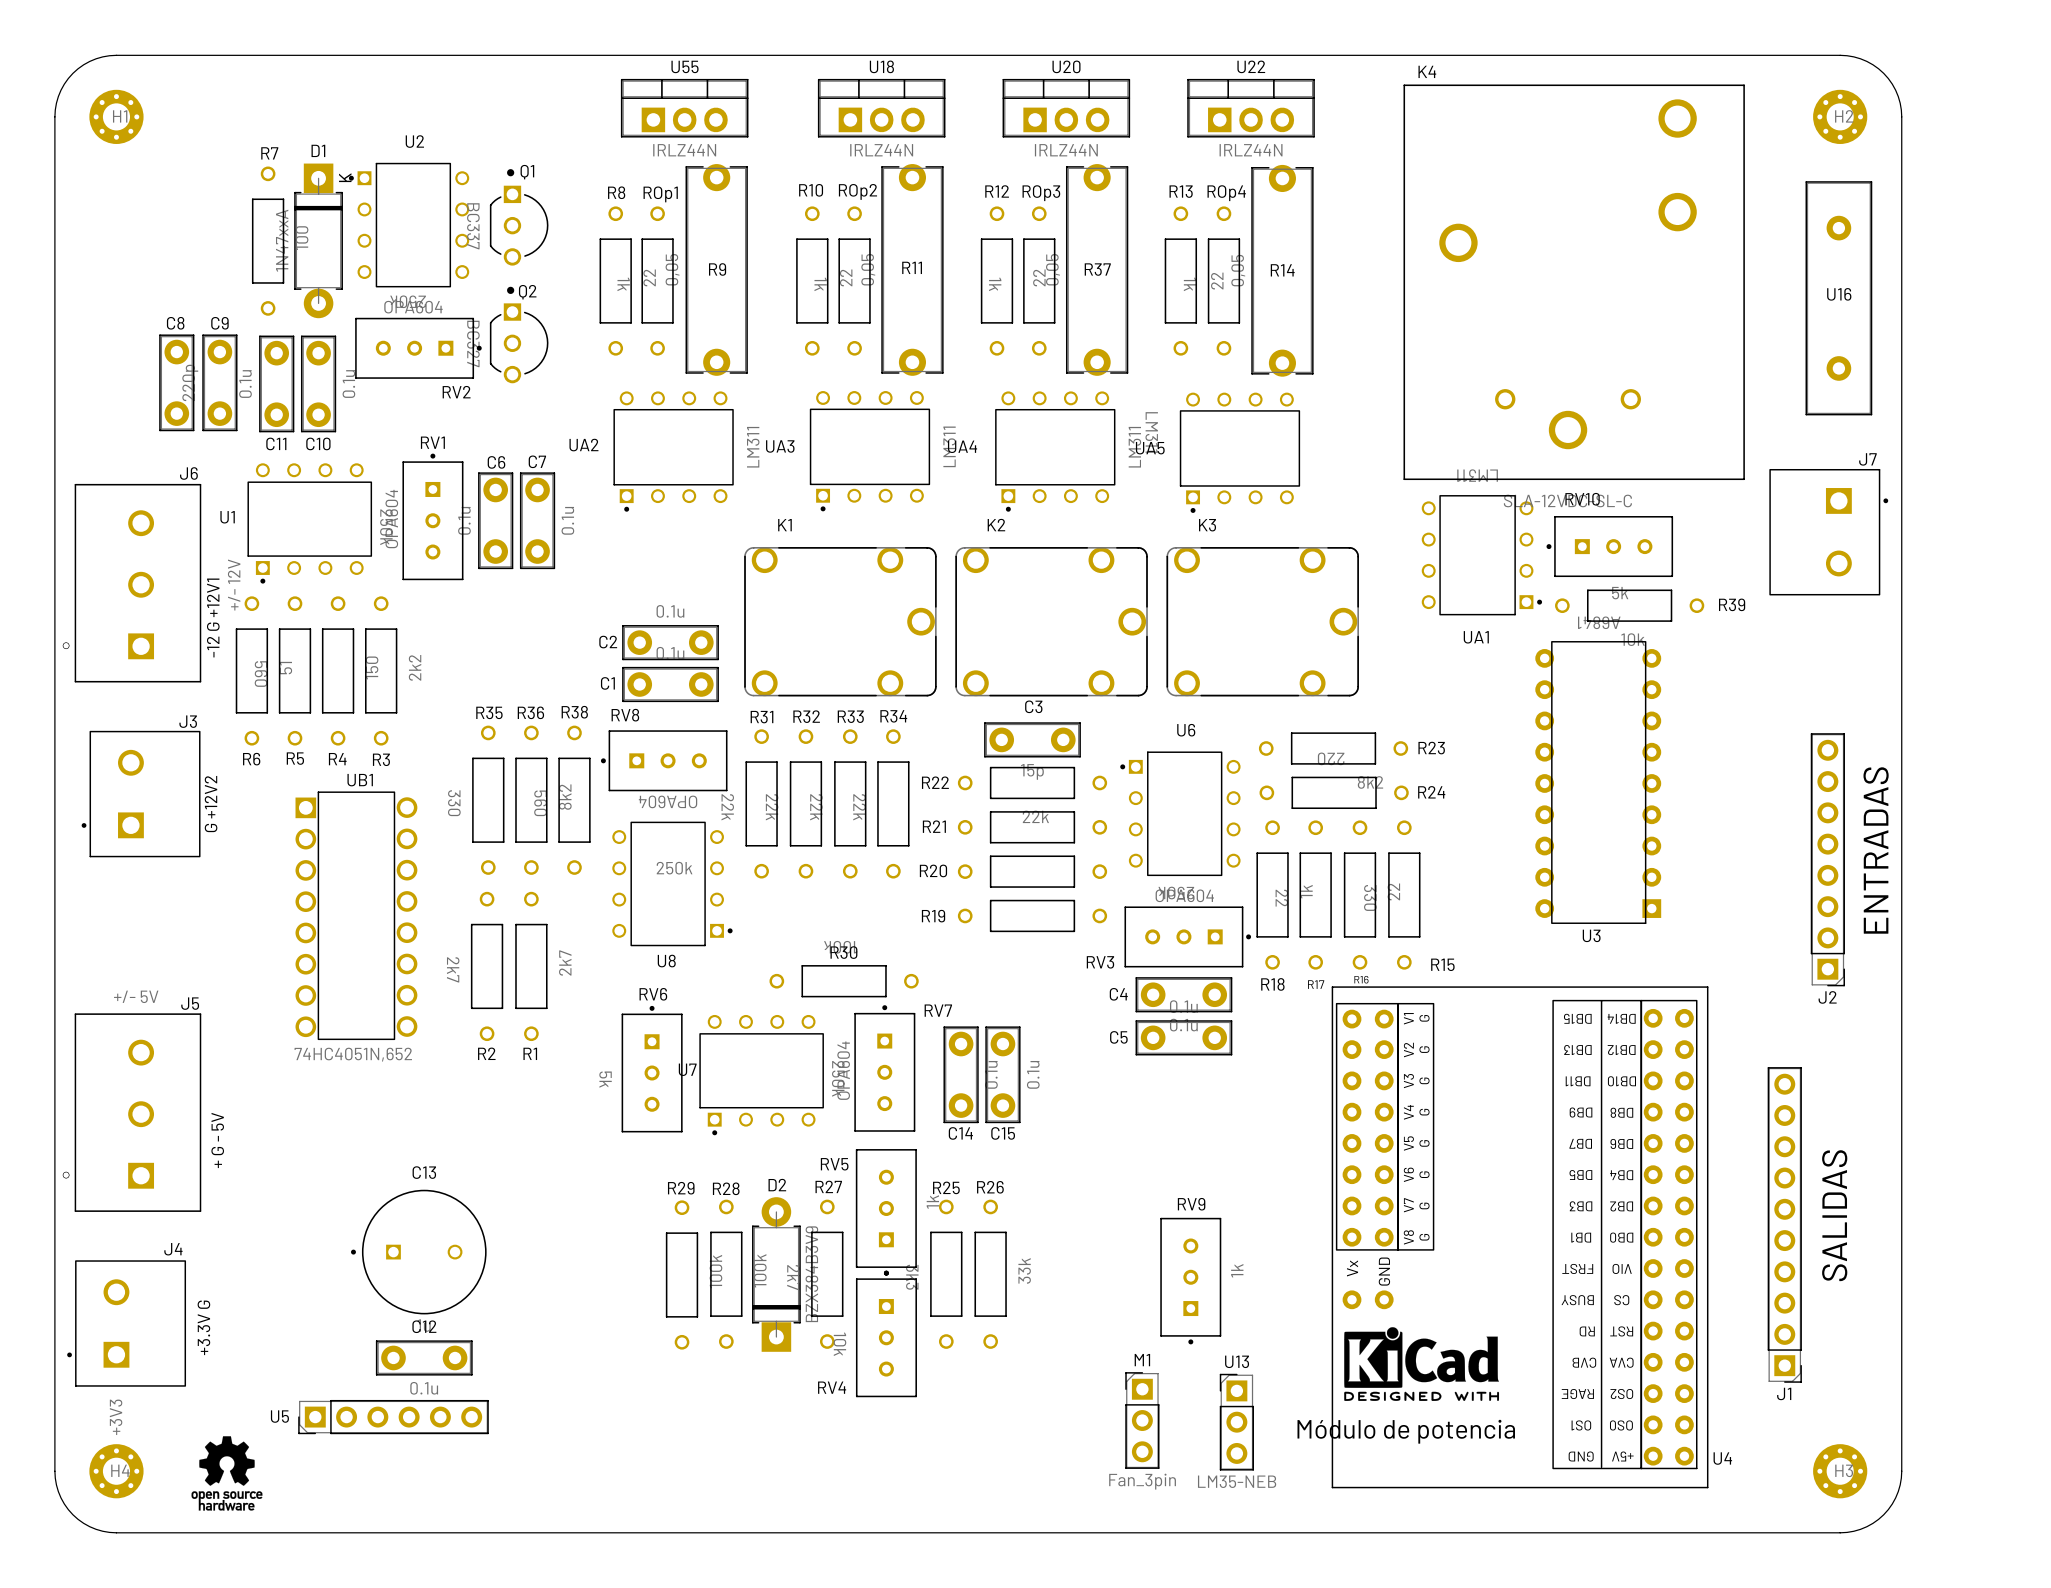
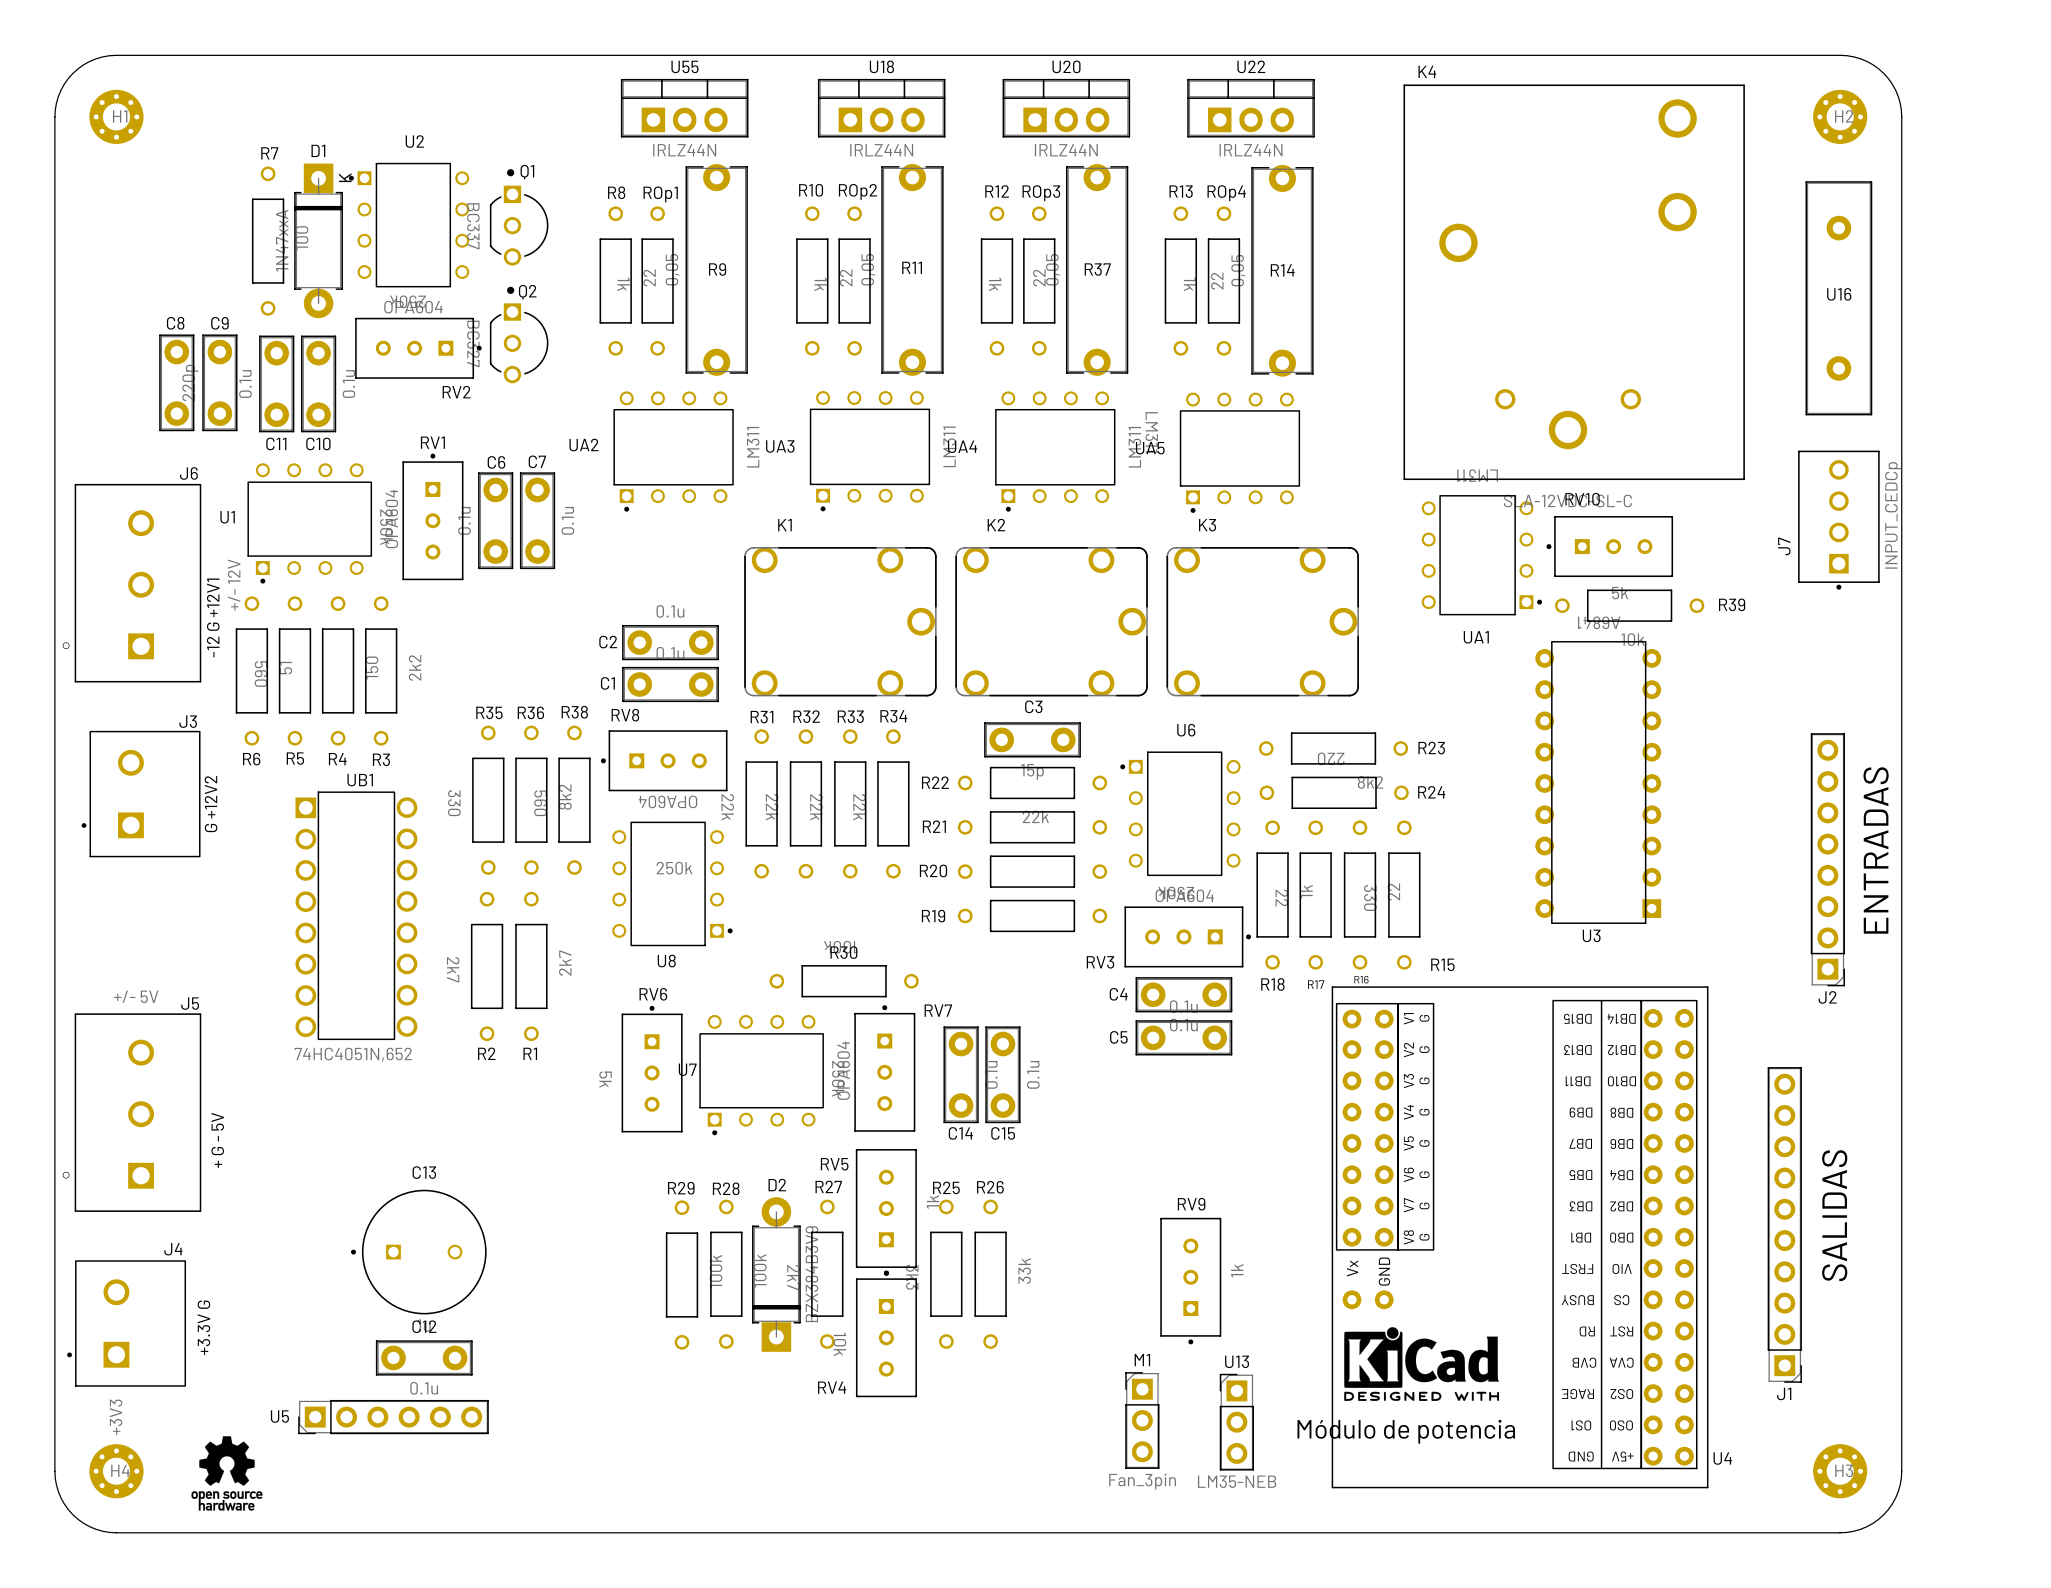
J7 name position: J7 (1867, 459) -> J7 (1784, 546)
J7 footprint: [1769, 468, 1889, 596] -> [1798, 450, 1880, 590]
J7 value: none -> INPUT_CEDCp (1893, 515)

